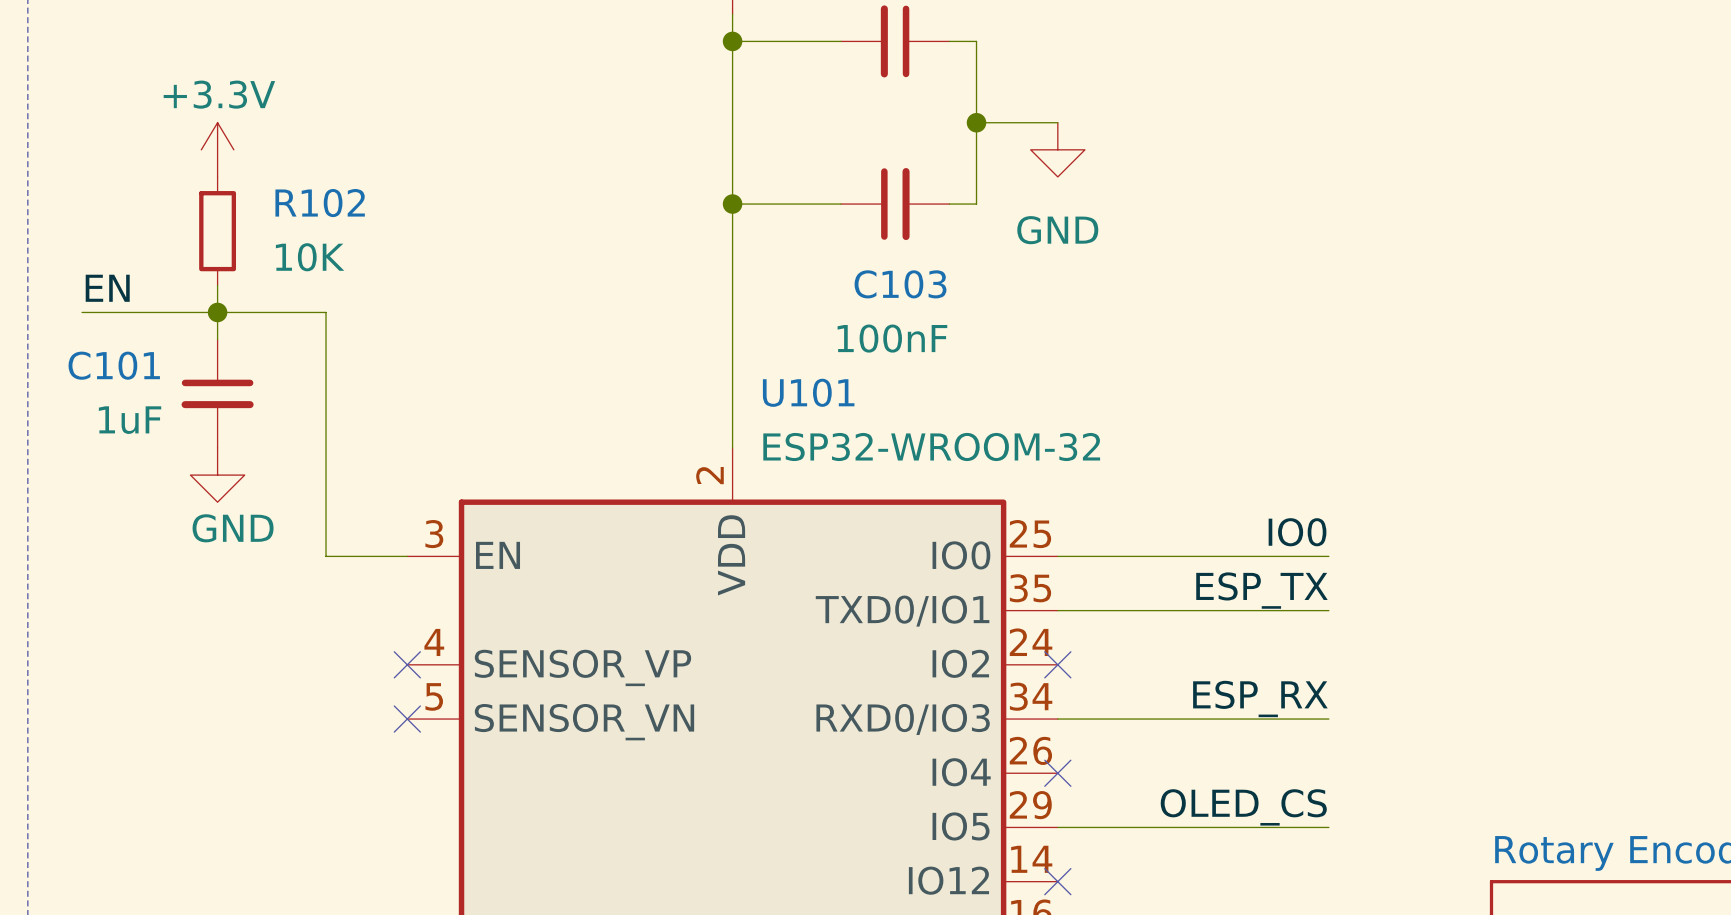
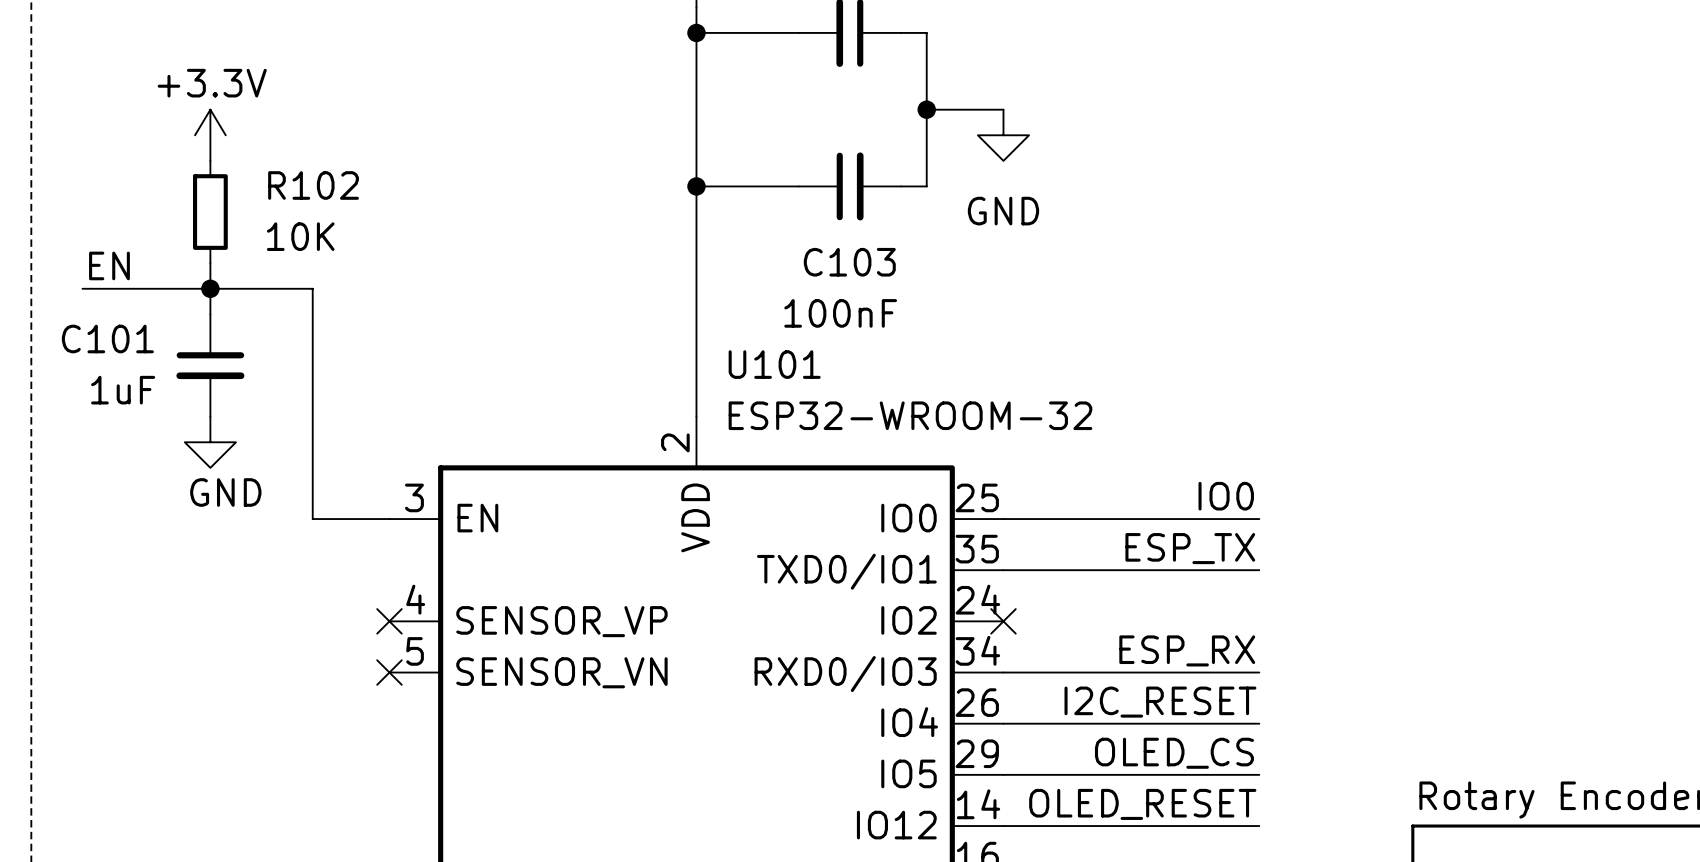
label: none -> I2C_RESET (1160, 702)
wire: none -> (1003, 723) (1259, 723)
no-connect mark: (1057, 773) -> none
label: none -> OLED_RESET (1142, 804)
wire: none -> (1003, 826) (1259, 826)
no-connect mark: (1057, 881) -> none

